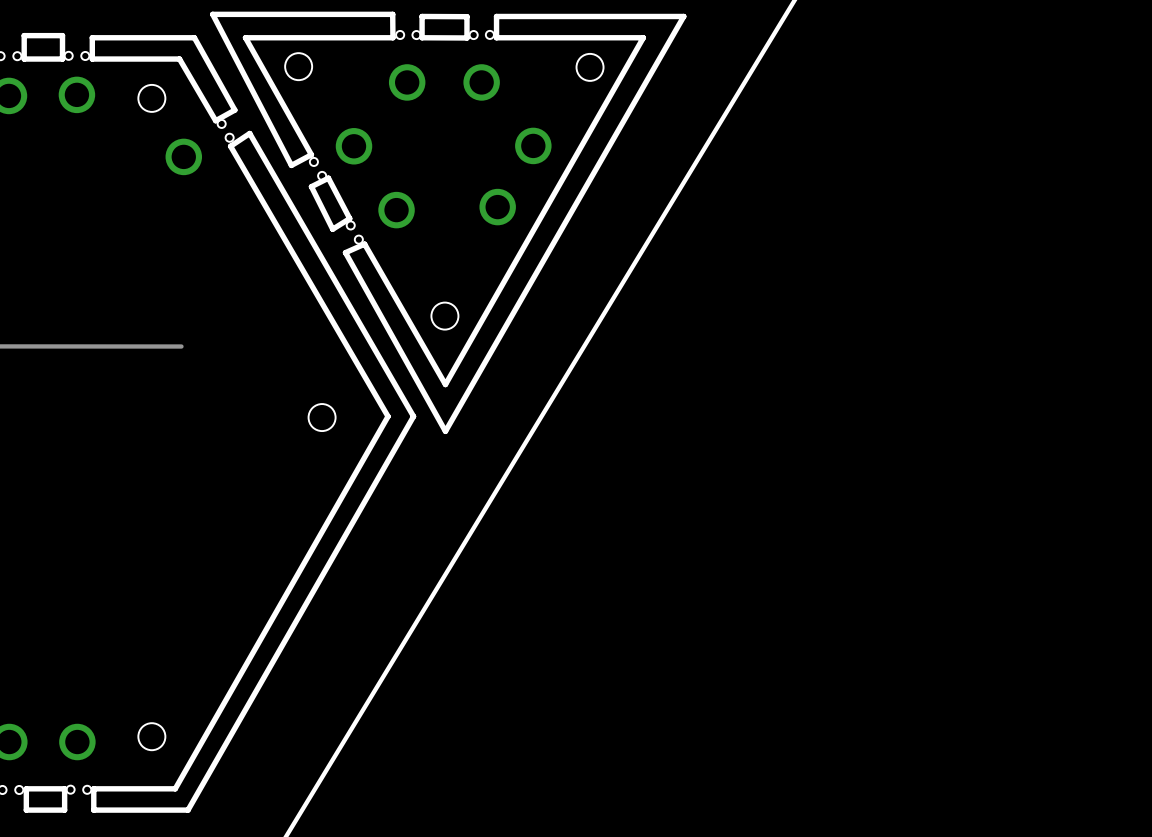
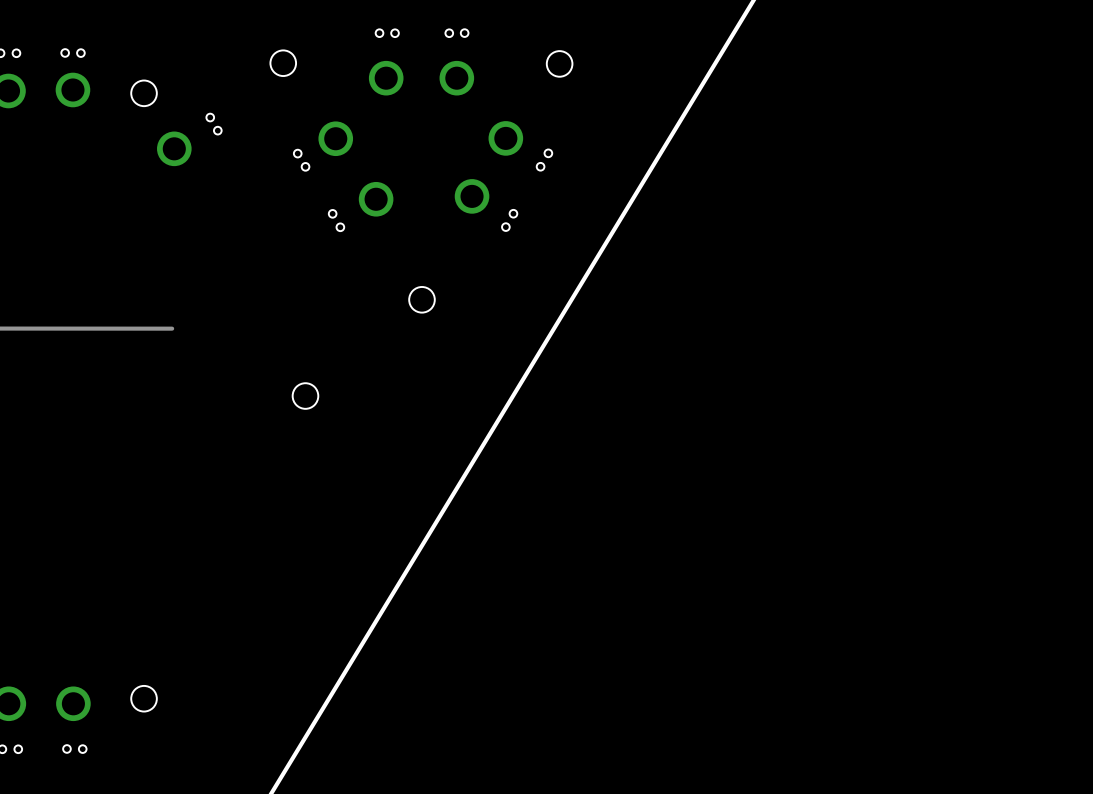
board edge: (392, 14) (392, 37) (245, 37) (311, 154) (291, 165) (212, 14) (392, 14) -> none
board edge: (422, 16) (466, 16) (466, 37) (422, 37) (422, 16) -> none
board edge: (683, 16) (496, 16) (496, 37) (643, 37) (445, 384) (364, 244) (345, 252) (445, 431) (683, 16) -> none
board edge: (62, 35) (62, 59) (24, 59) (24, 35) (62, 35) -> none
board edge: (194, 37) (92, 37) (92, 59) (179, 59) (215, 120) (234, 110) (194, 37) -> none
board edge: (249, 133) (413, 416) (188, 810) (93, 810) (93, 788) (175, 788) (388, 416) (230, 146) (249, 133) -> none
hole: none -> (548, 153)
hole: none -> (540, 166)
board edge: (328, 178) (349, 218) (332, 229) (311, 186) (328, 178) -> none
hole: none -> (513, 213)
hole: none -> (505, 227)
board edge: (64, 788) (26, 788) (26, 810) (64, 810) (64, 788) -> none

